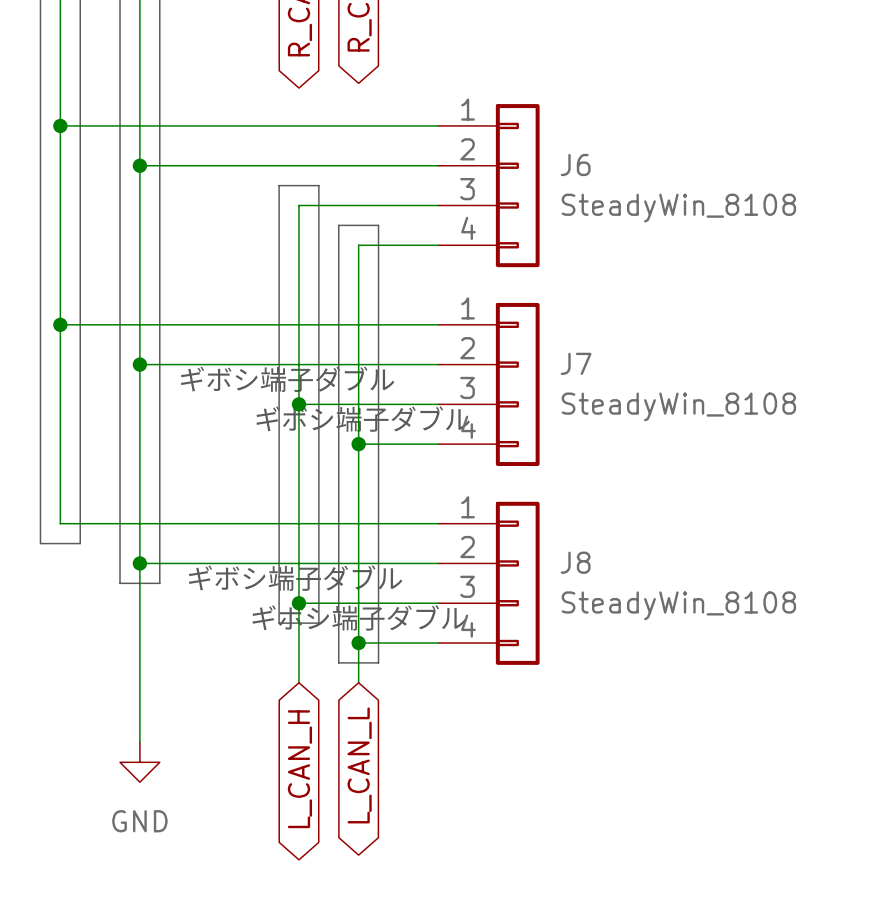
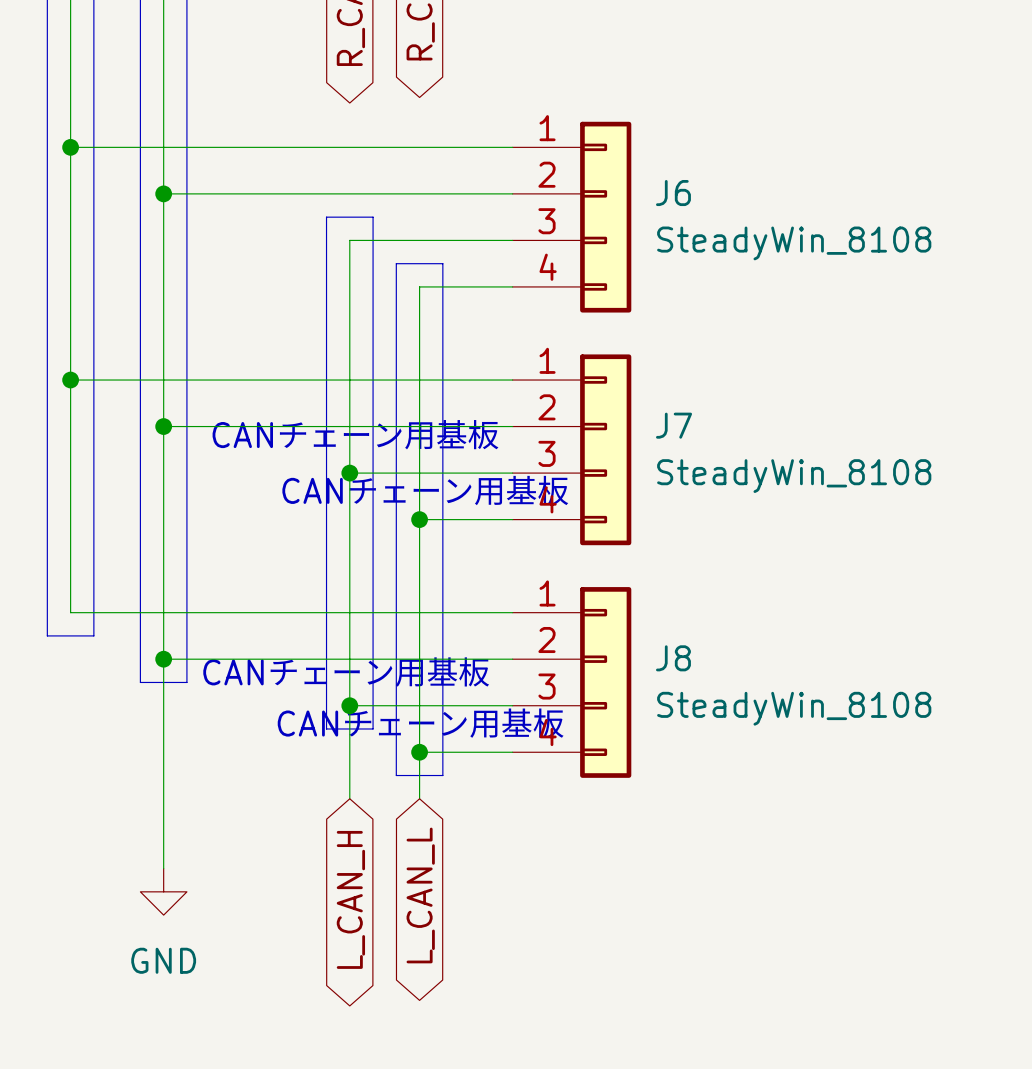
text: none -> CANチェーン用基板 (356, 434)
text: ギボシ端子ダブル (287, 379) -> none
text: ギボシ端子ダブル (363, 419) -> CANチェーン用基板 (426, 490)
text: ギボシ端子ダブル (295, 578) -> CANチェーン用基板 (346, 672)
text: ギボシ端子ダブル (359, 617) -> CANチェーン用基板 (421, 723)

